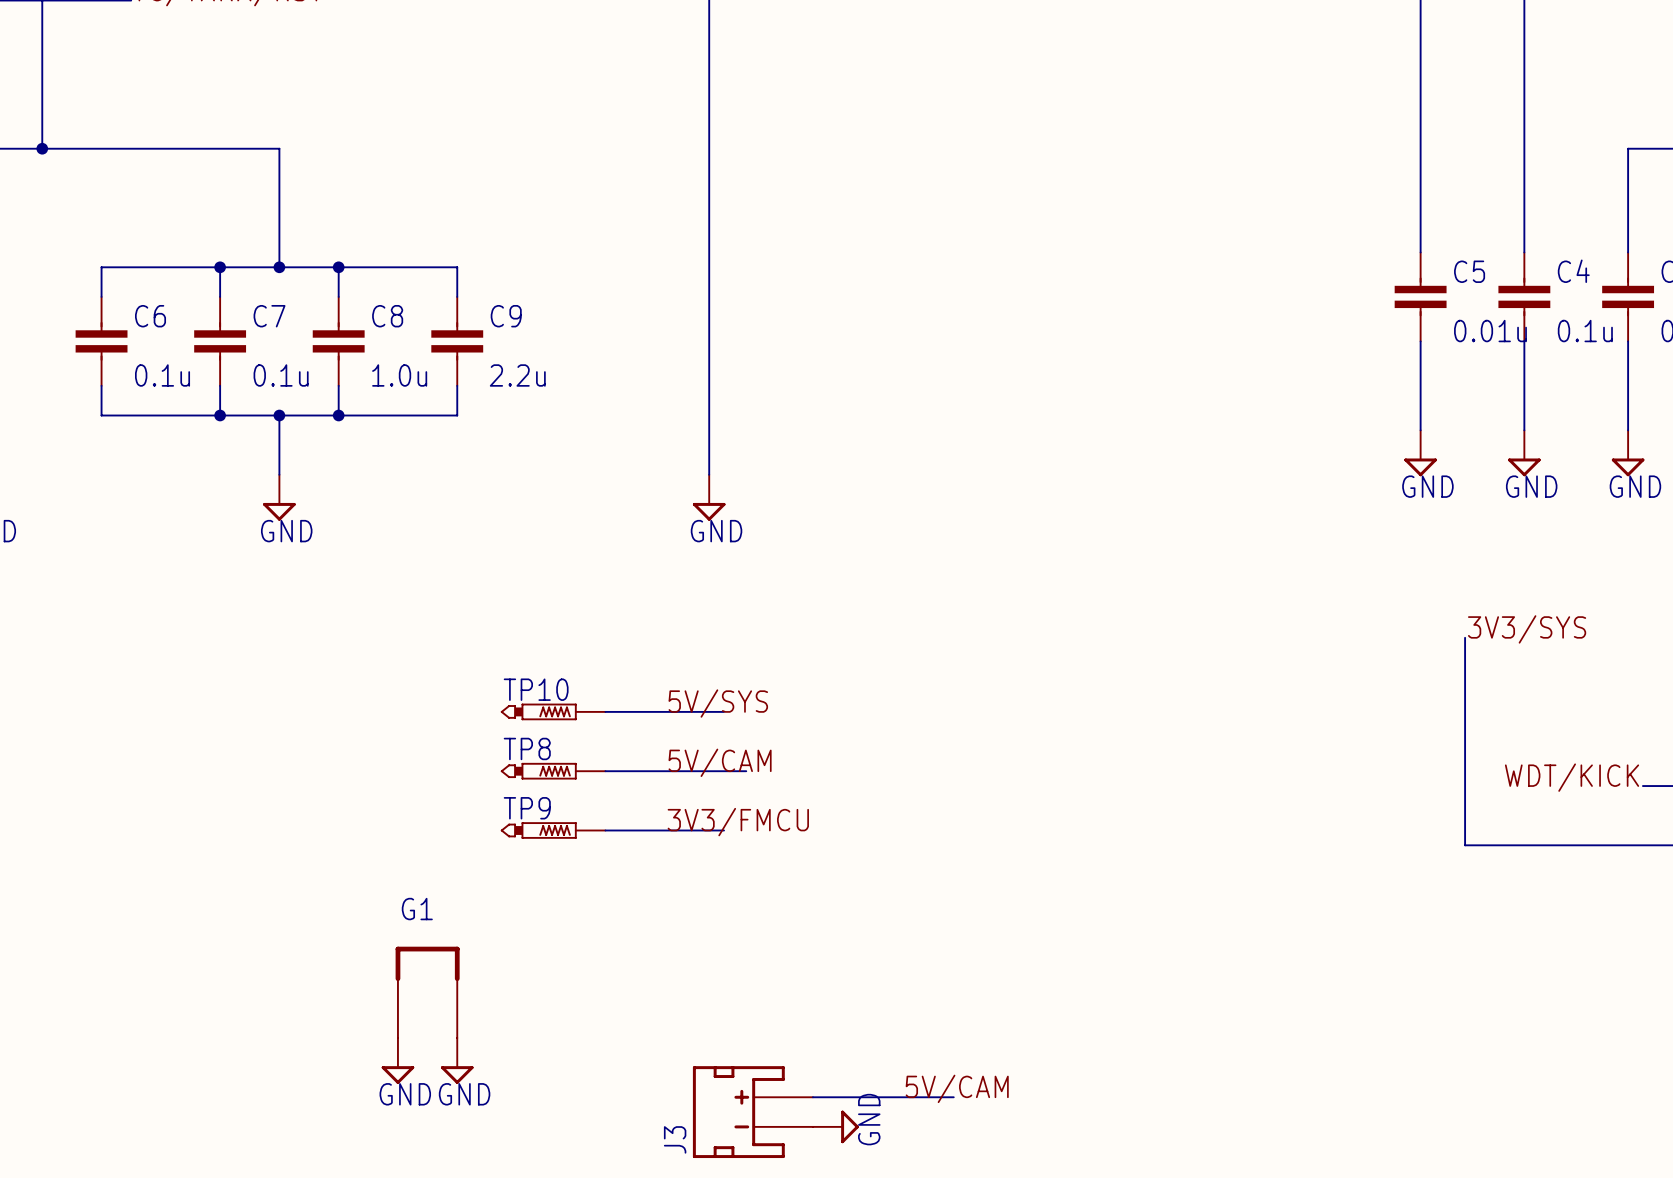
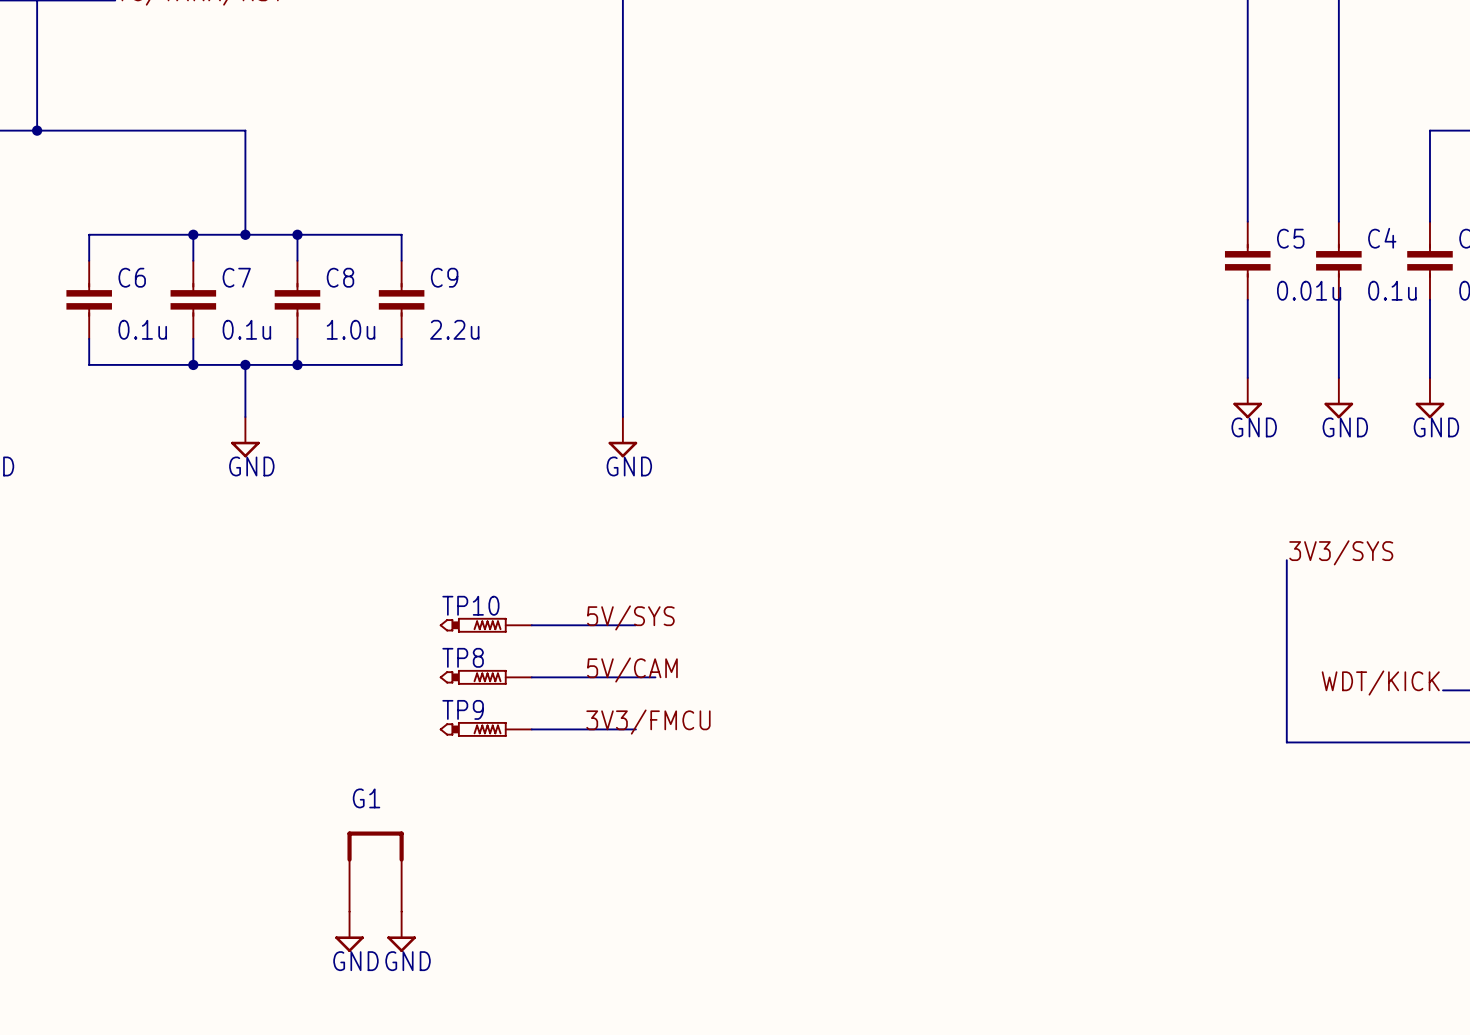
label: 5V/CAM (957, 1088) -> none
wire: (812, 1097) (953, 1097) -> none
J3: (752, 1112) -> none
power symbol: GND (835, 1126) -> none

